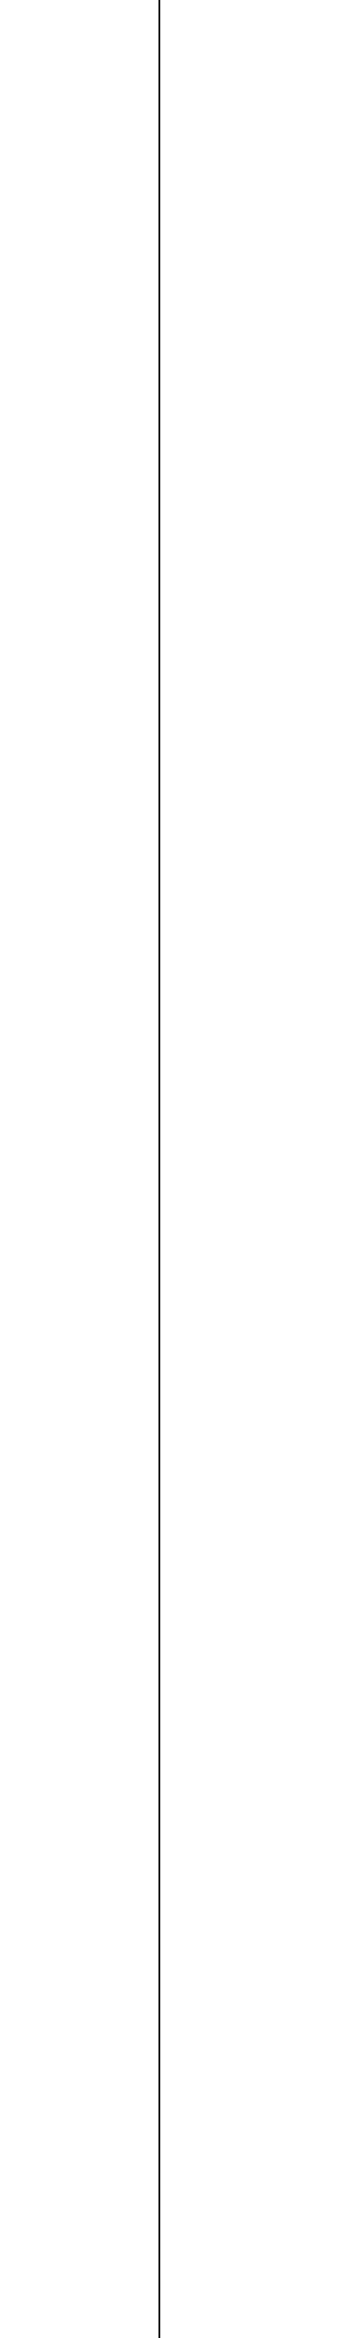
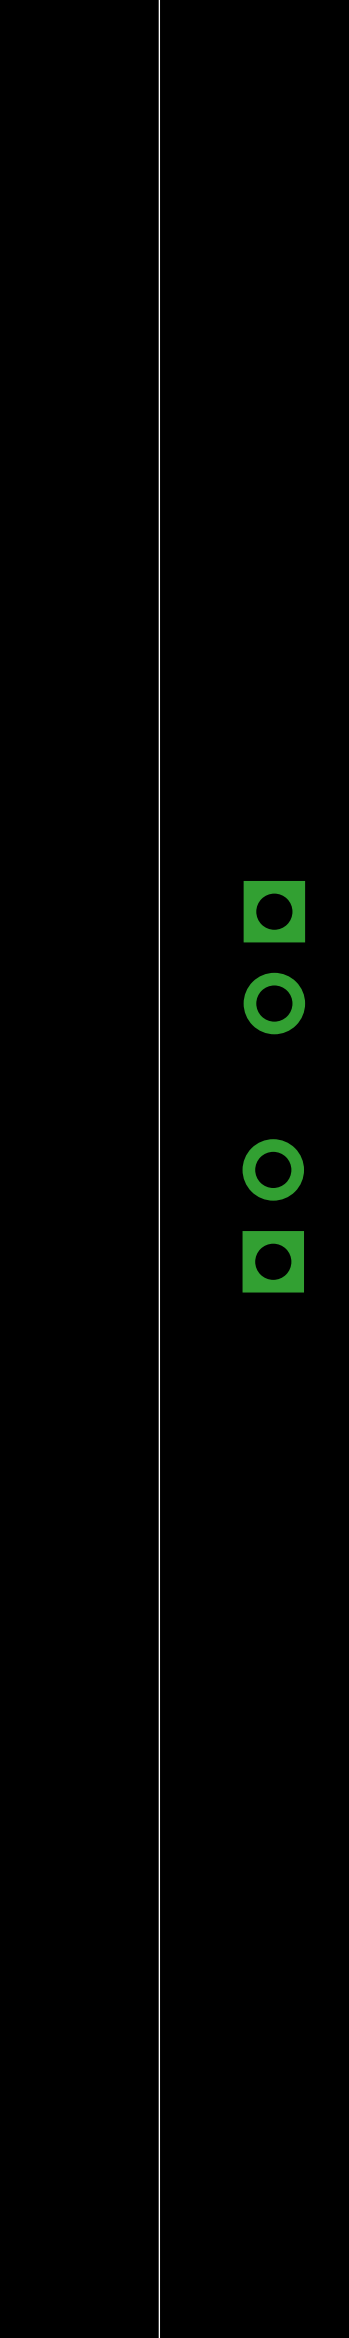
part: none -> (274, 957)
part: none -> (273, 1215)

